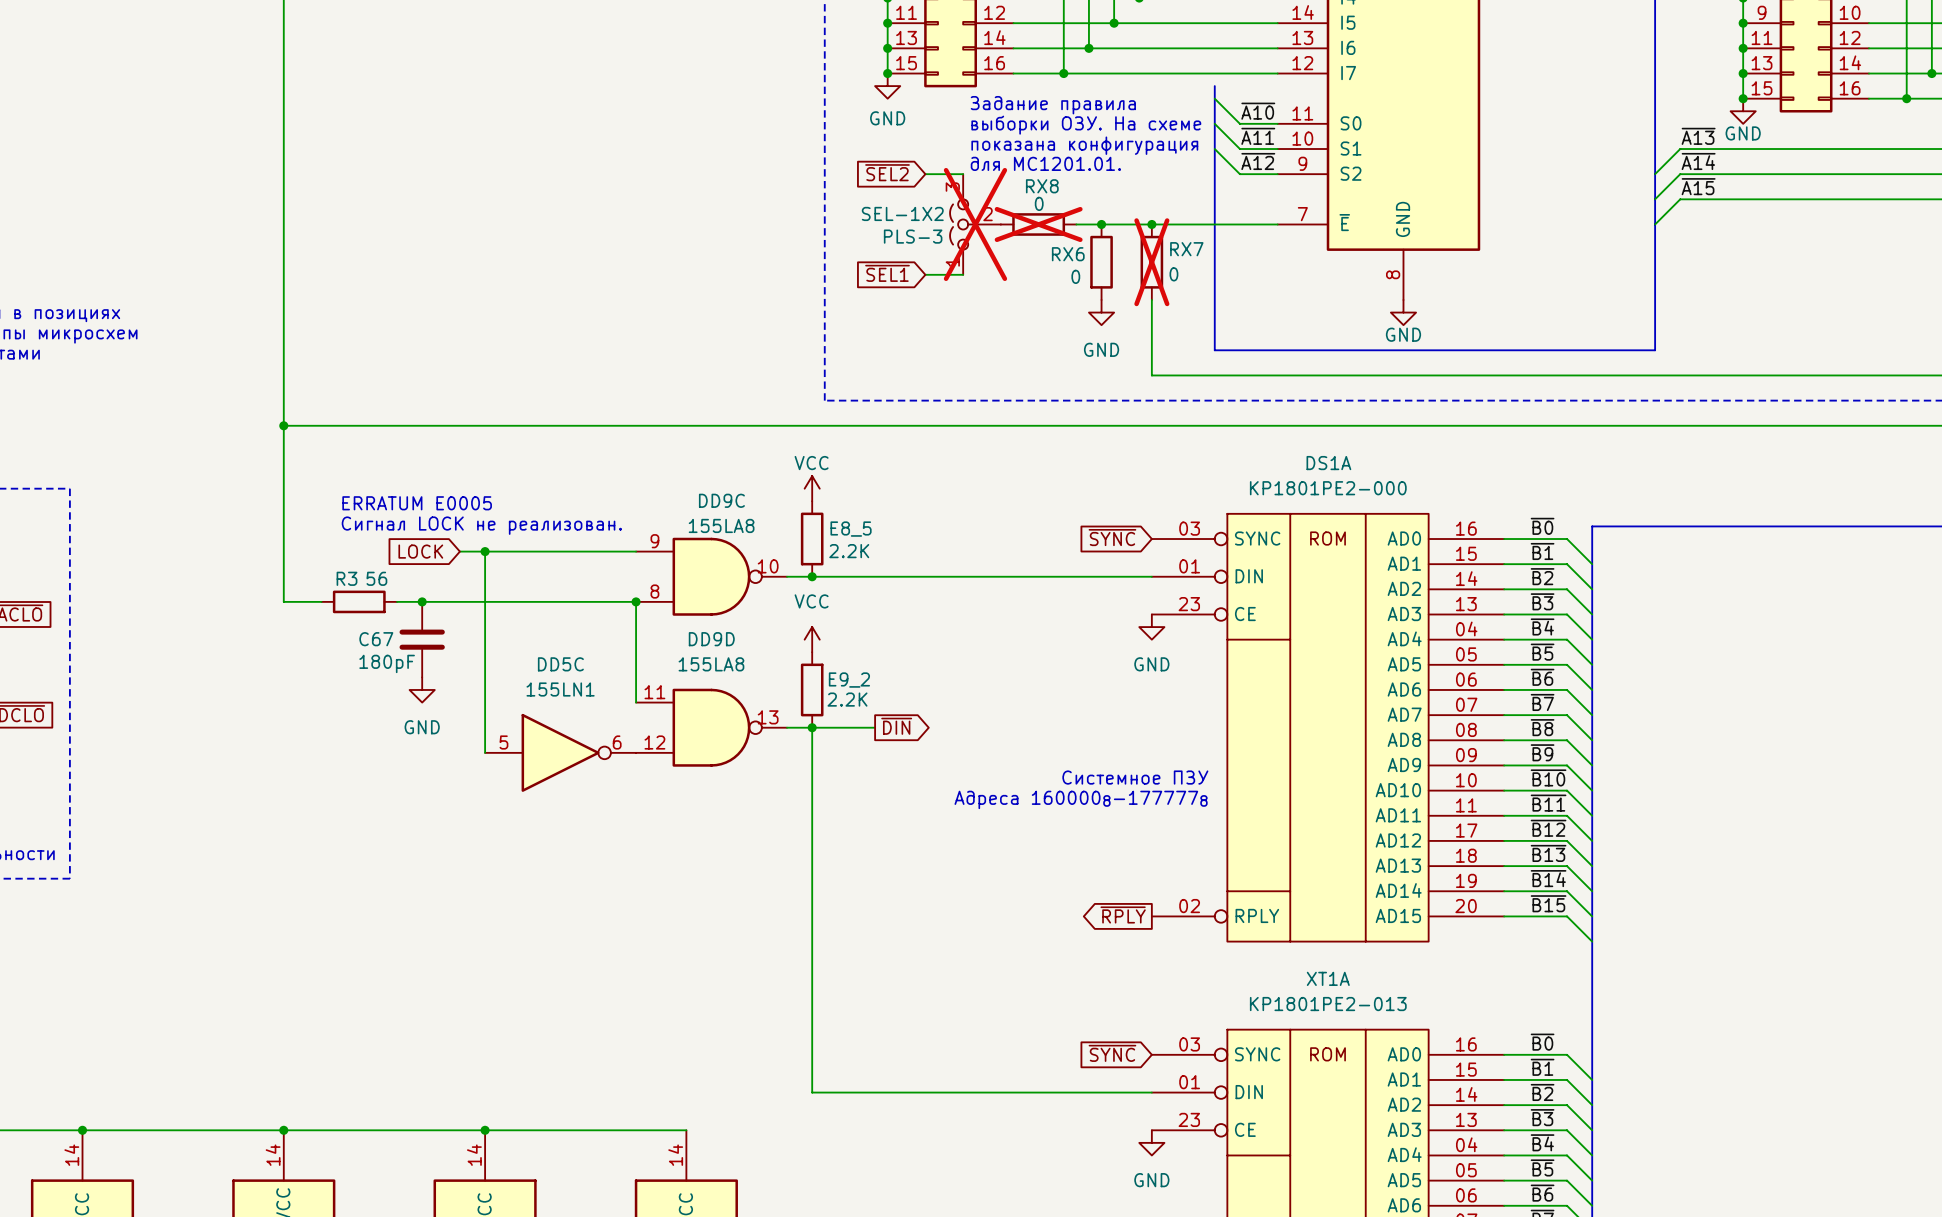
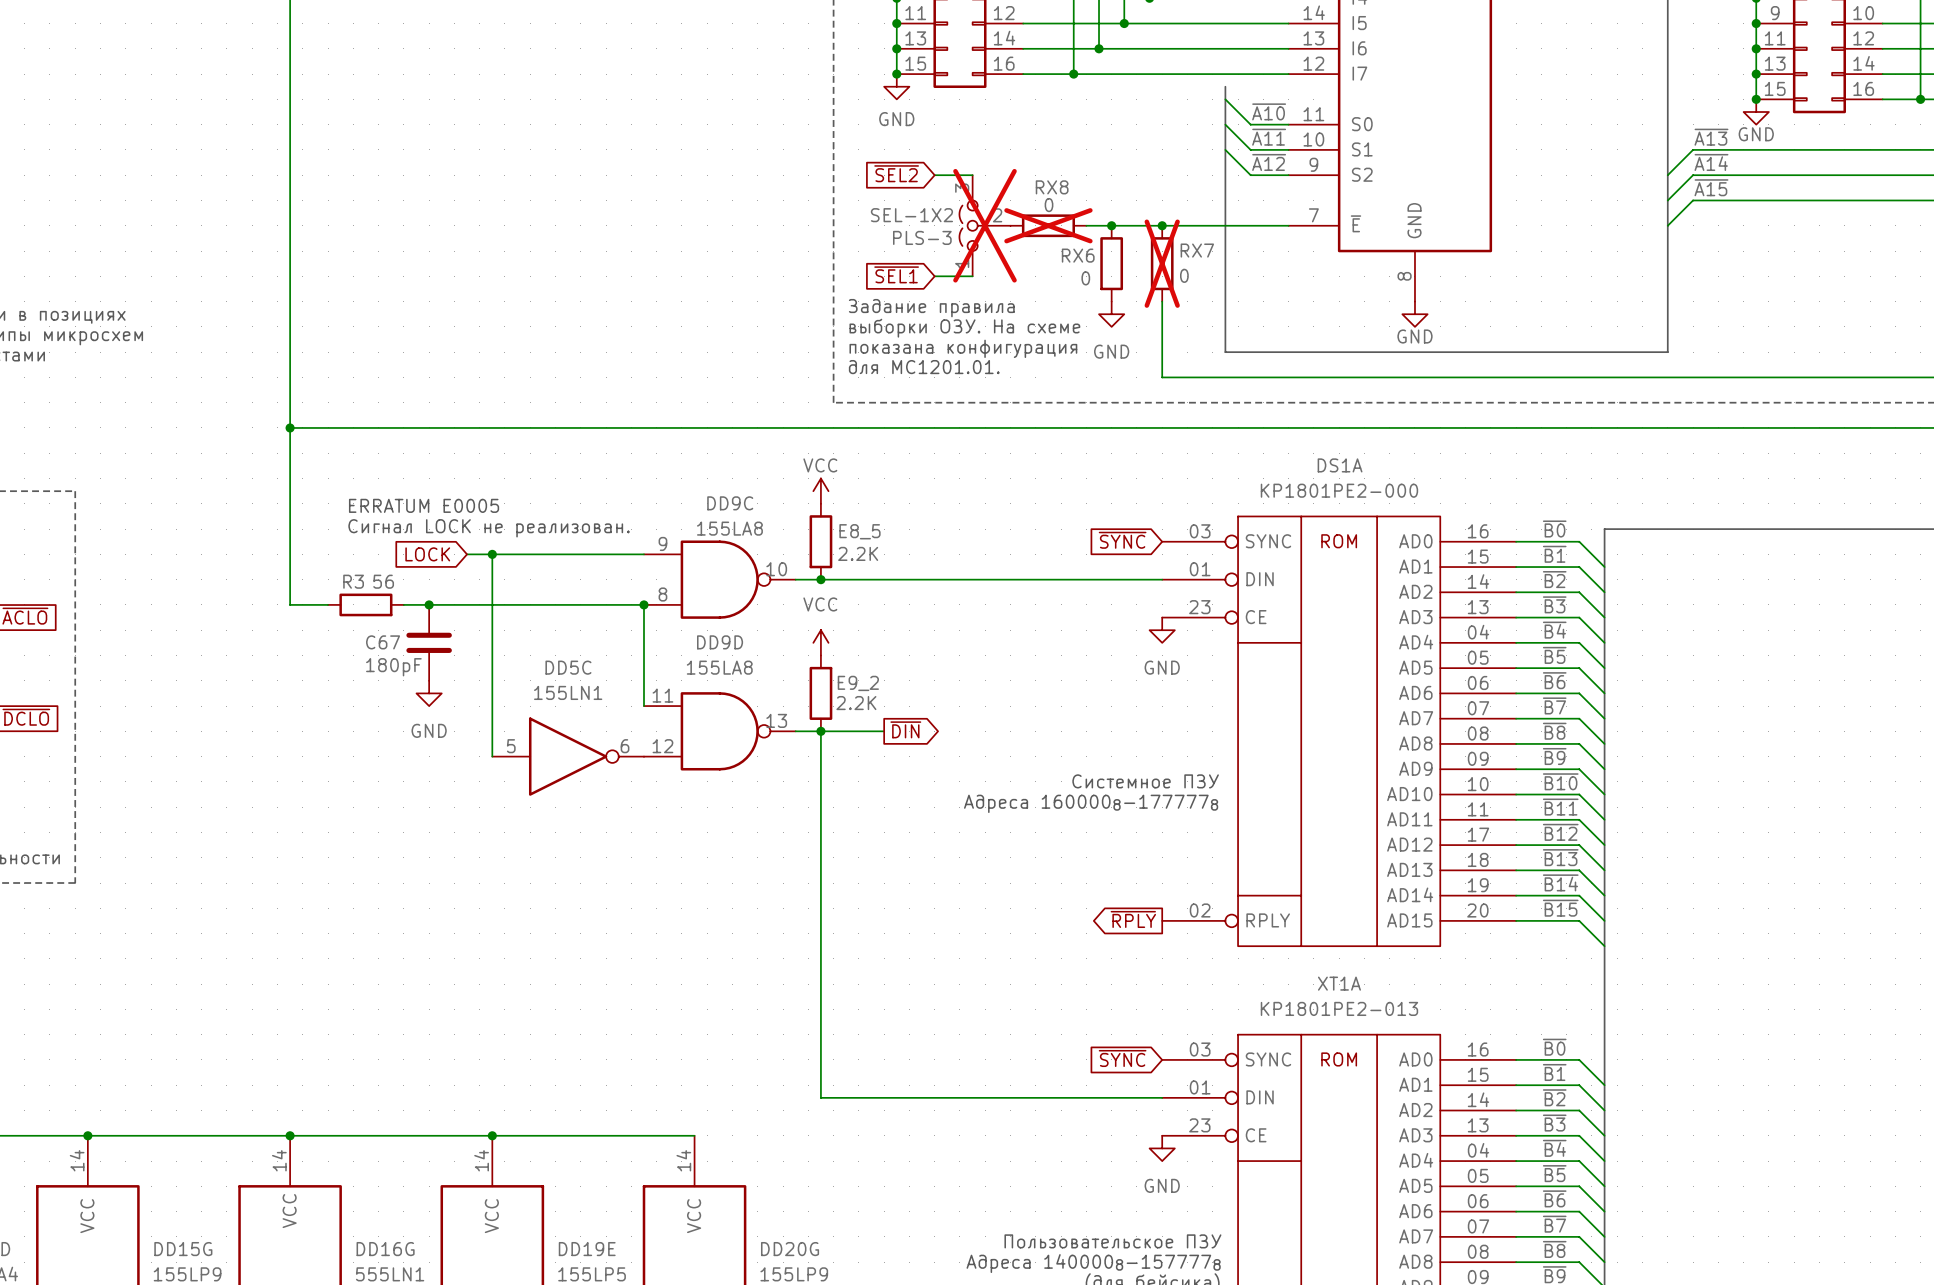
text position: Задание правила (1053, 105) -> Задание правила (931, 308)
text position: выборки ОЗУ. На схеме (1086, 125) -> выборки ОЗУ. На схеме (964, 328)
text position: показана конфигурация (1084, 145) -> показана конфигурация (963, 348)
text position: для МС1201.01. (1045, 163) -> для МС1201.01. (924, 367)

